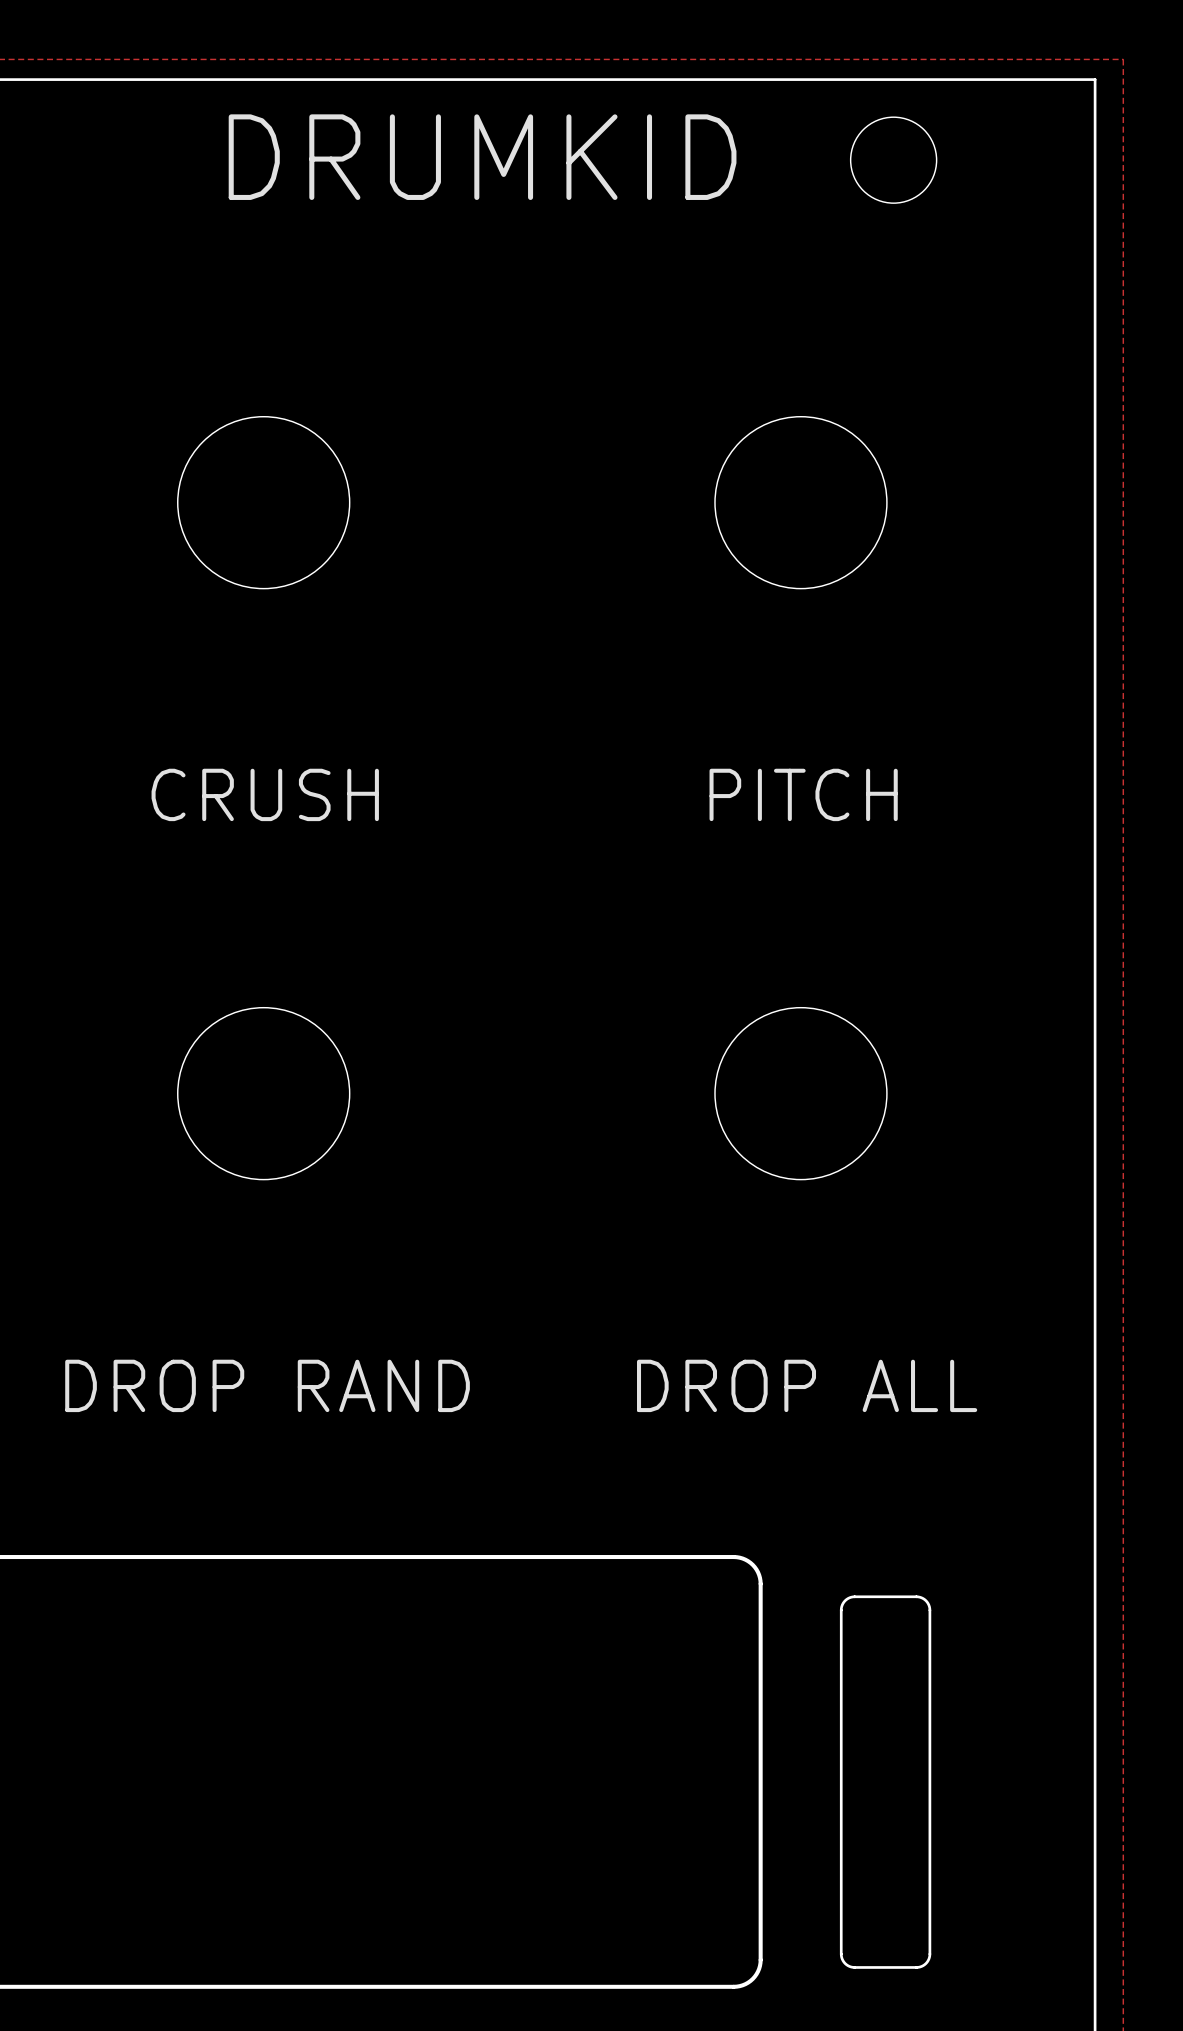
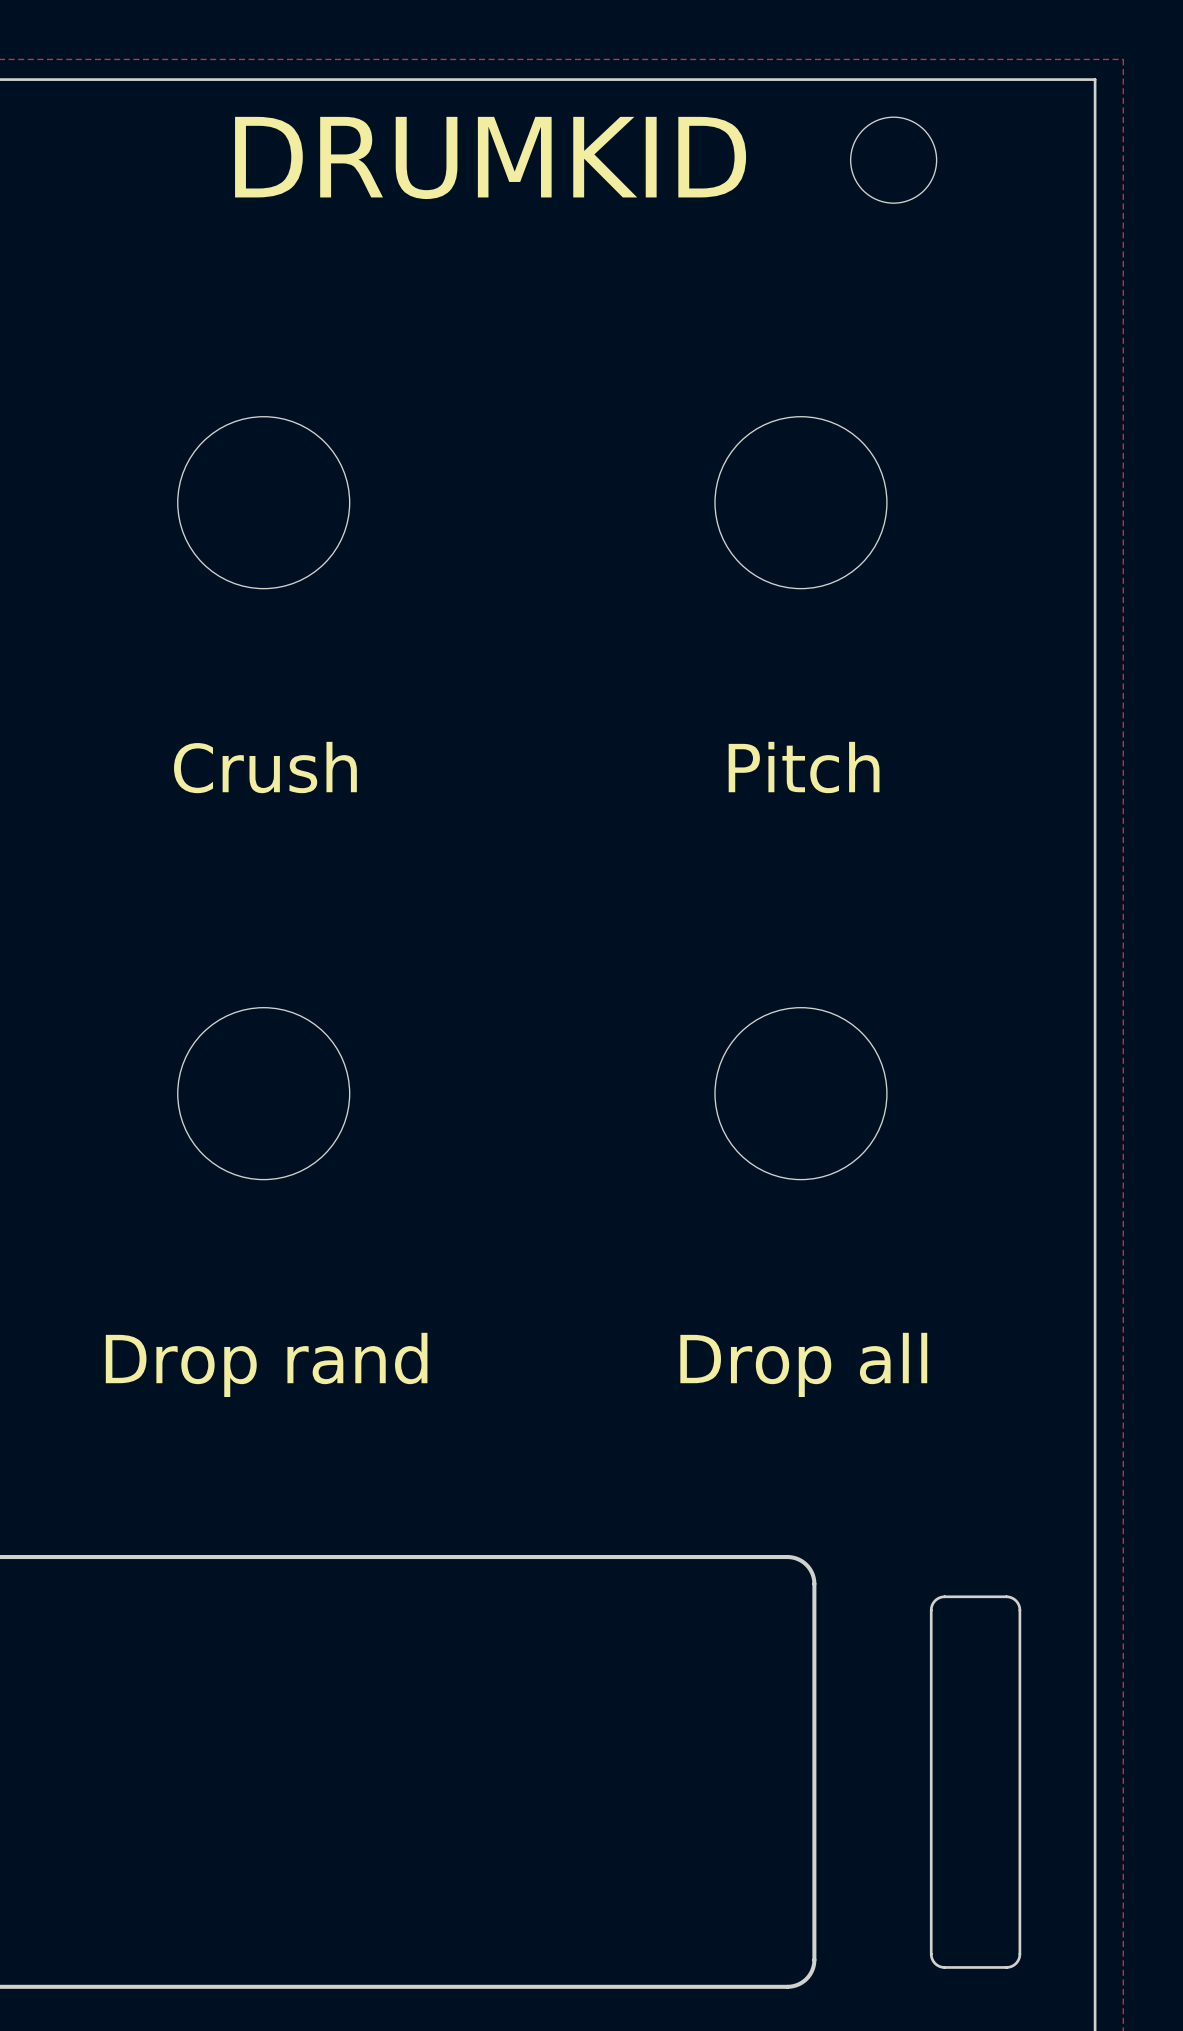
part value: CRUSH (265, 794) -> Crush (265, 767)
part value: PITCH (803, 794) -> Pitch (804, 767)
part value: DROP RAND (267, 1385) -> Drop rand (266, 1364)
part value: DROP ALL (807, 1385) -> Drop all (803, 1364)
board edge: (733, 1557) (745, 1559) (752, 1564) (758, 1572) (760, 1583) (760, 1962) (758, 1971) (752, 1978) (745, 1984) (733, 1986) -> (733, 1557) (796, 1558) (808, 1567) (812, 1575) (814, 1583) (813, 1965) (806, 1978) (793, 1986) (733, 1986)
board edge: (854, 1596) (918, 1596) (925, 1600) (929, 1608) (929, 1954) (925, 1963) (918, 1967) (852, 1967) (845, 1963) (841, 1955) (841, 1610) (845, 1600) (854, 1596) -> (944, 1596) (1008, 1596) (1015, 1600) (1019, 1608) (1019, 1954) (1015, 1963) (1008, 1967) (942, 1967) (935, 1963) (931, 1955) (931, 1610) (935, 1600) (944, 1596)

